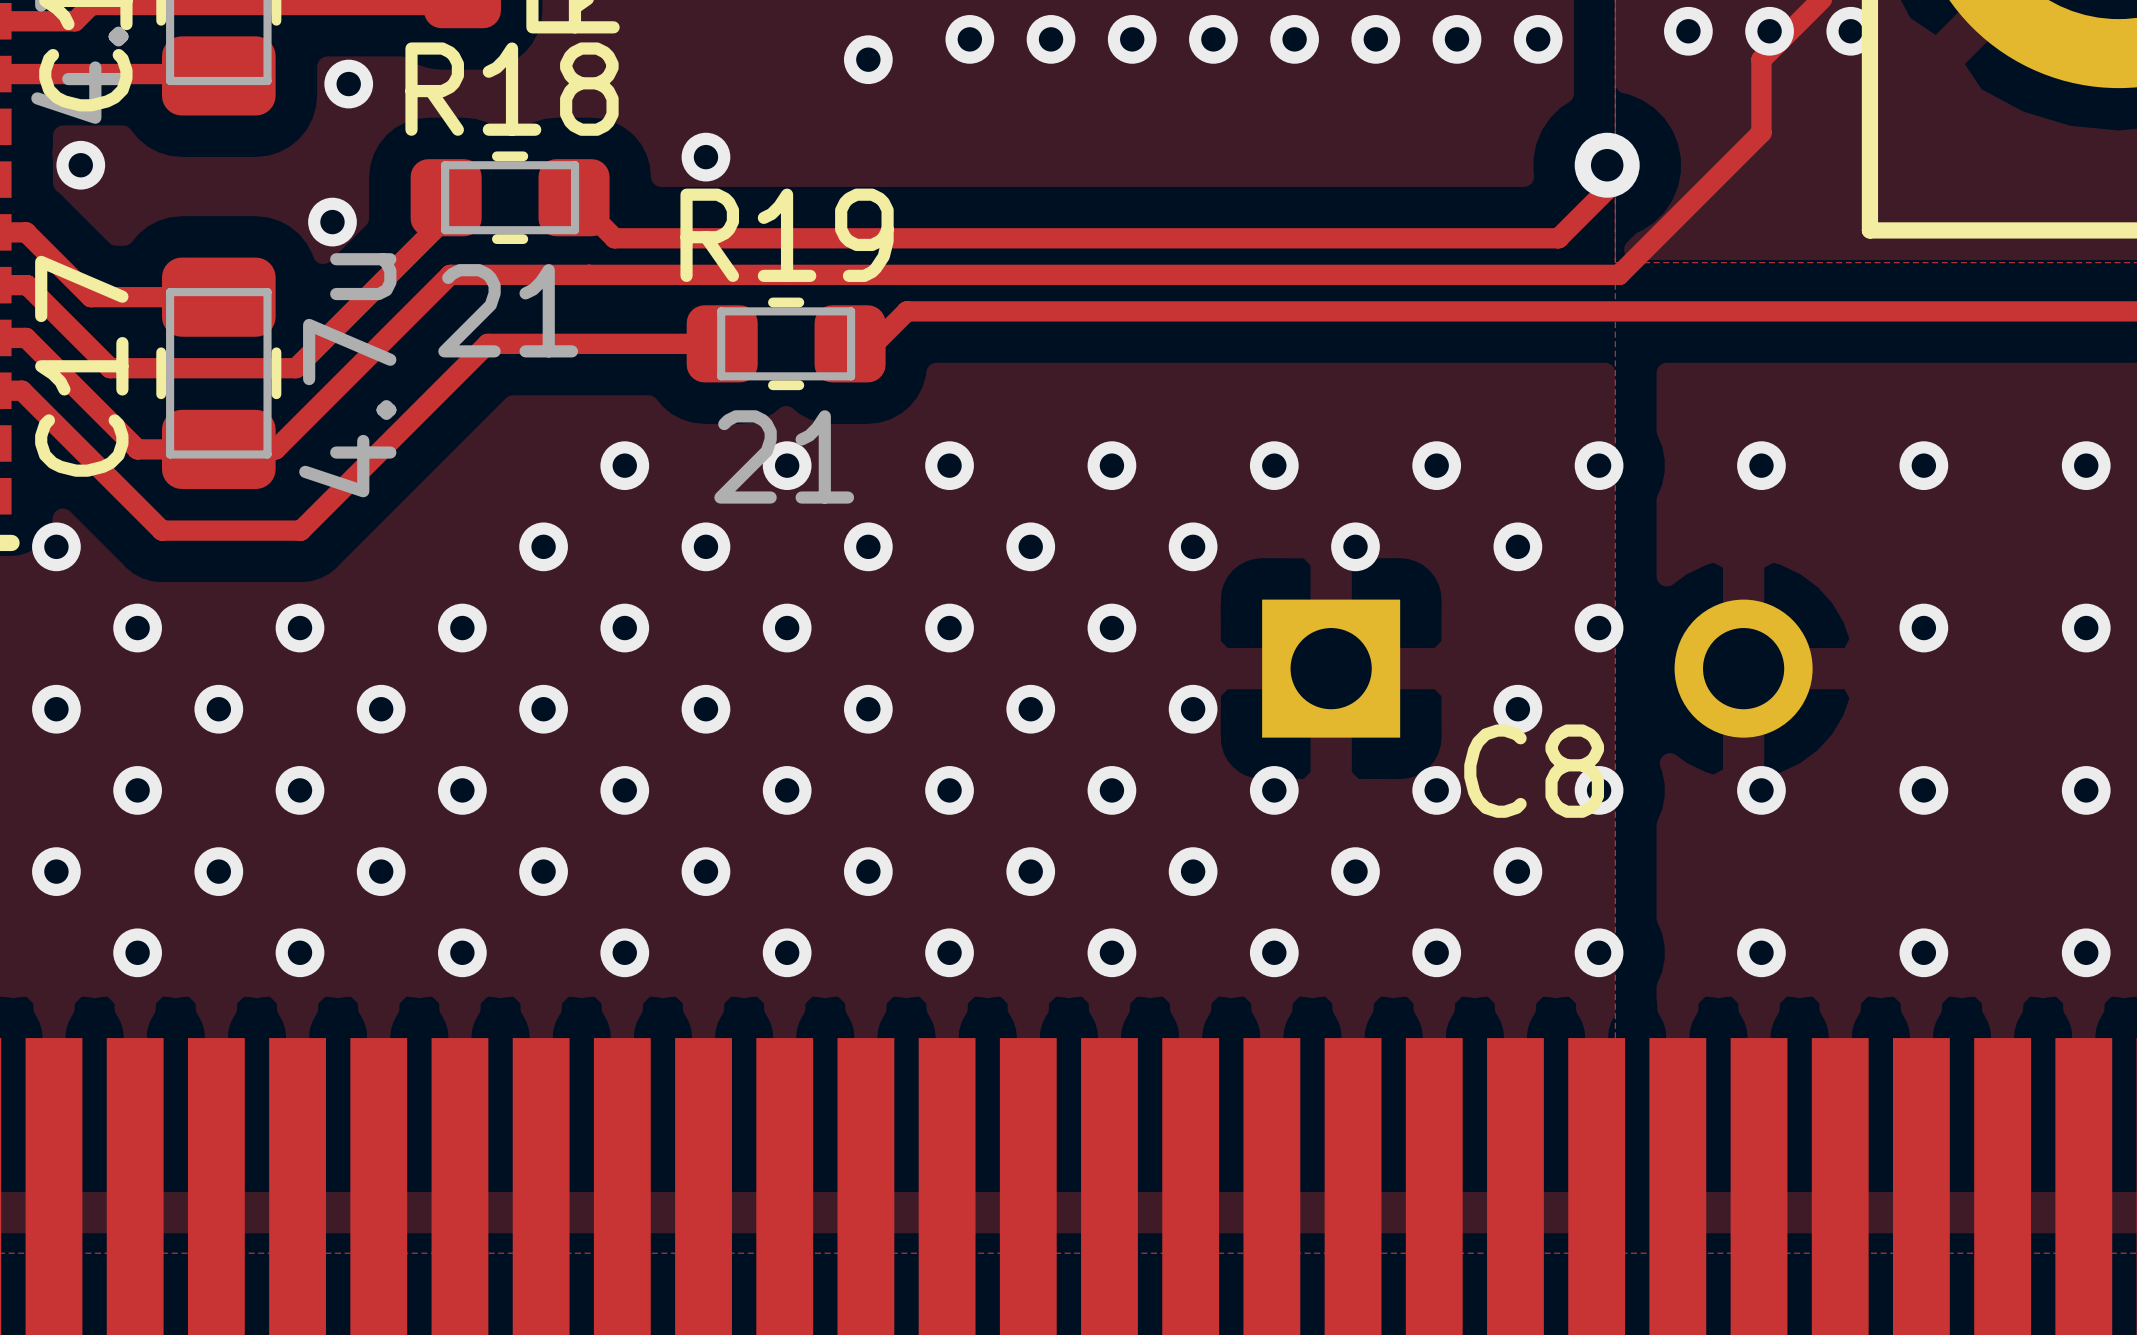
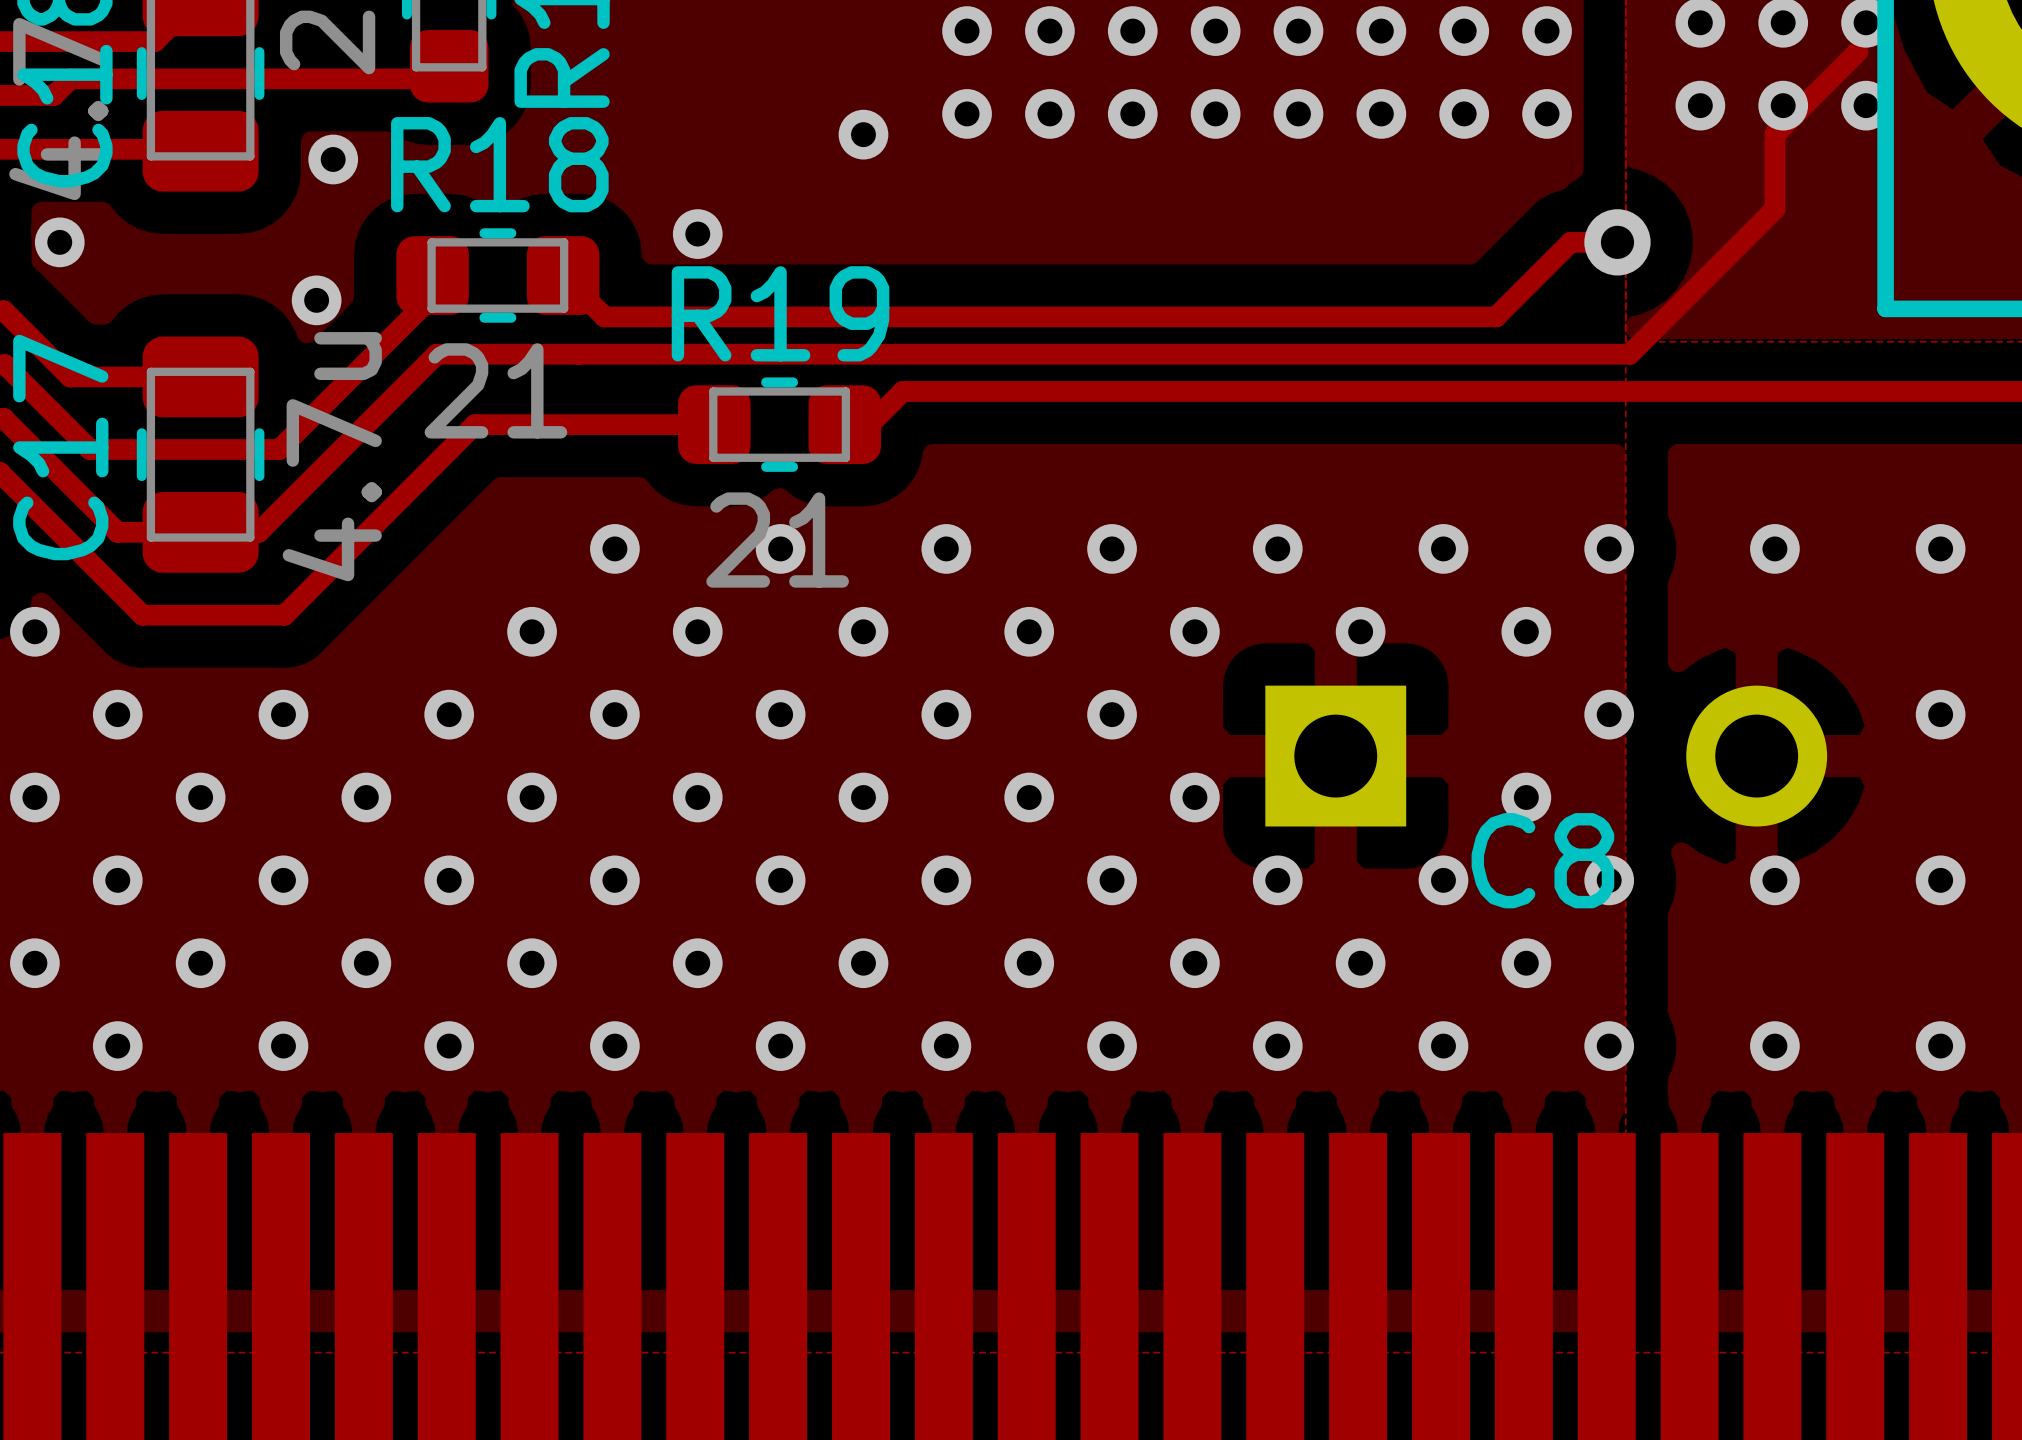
track: (1607, 165) (1607, 189) (1558, 238) (1488, 238) -> (1617, 242) (1570, 242) (1496, 316)

